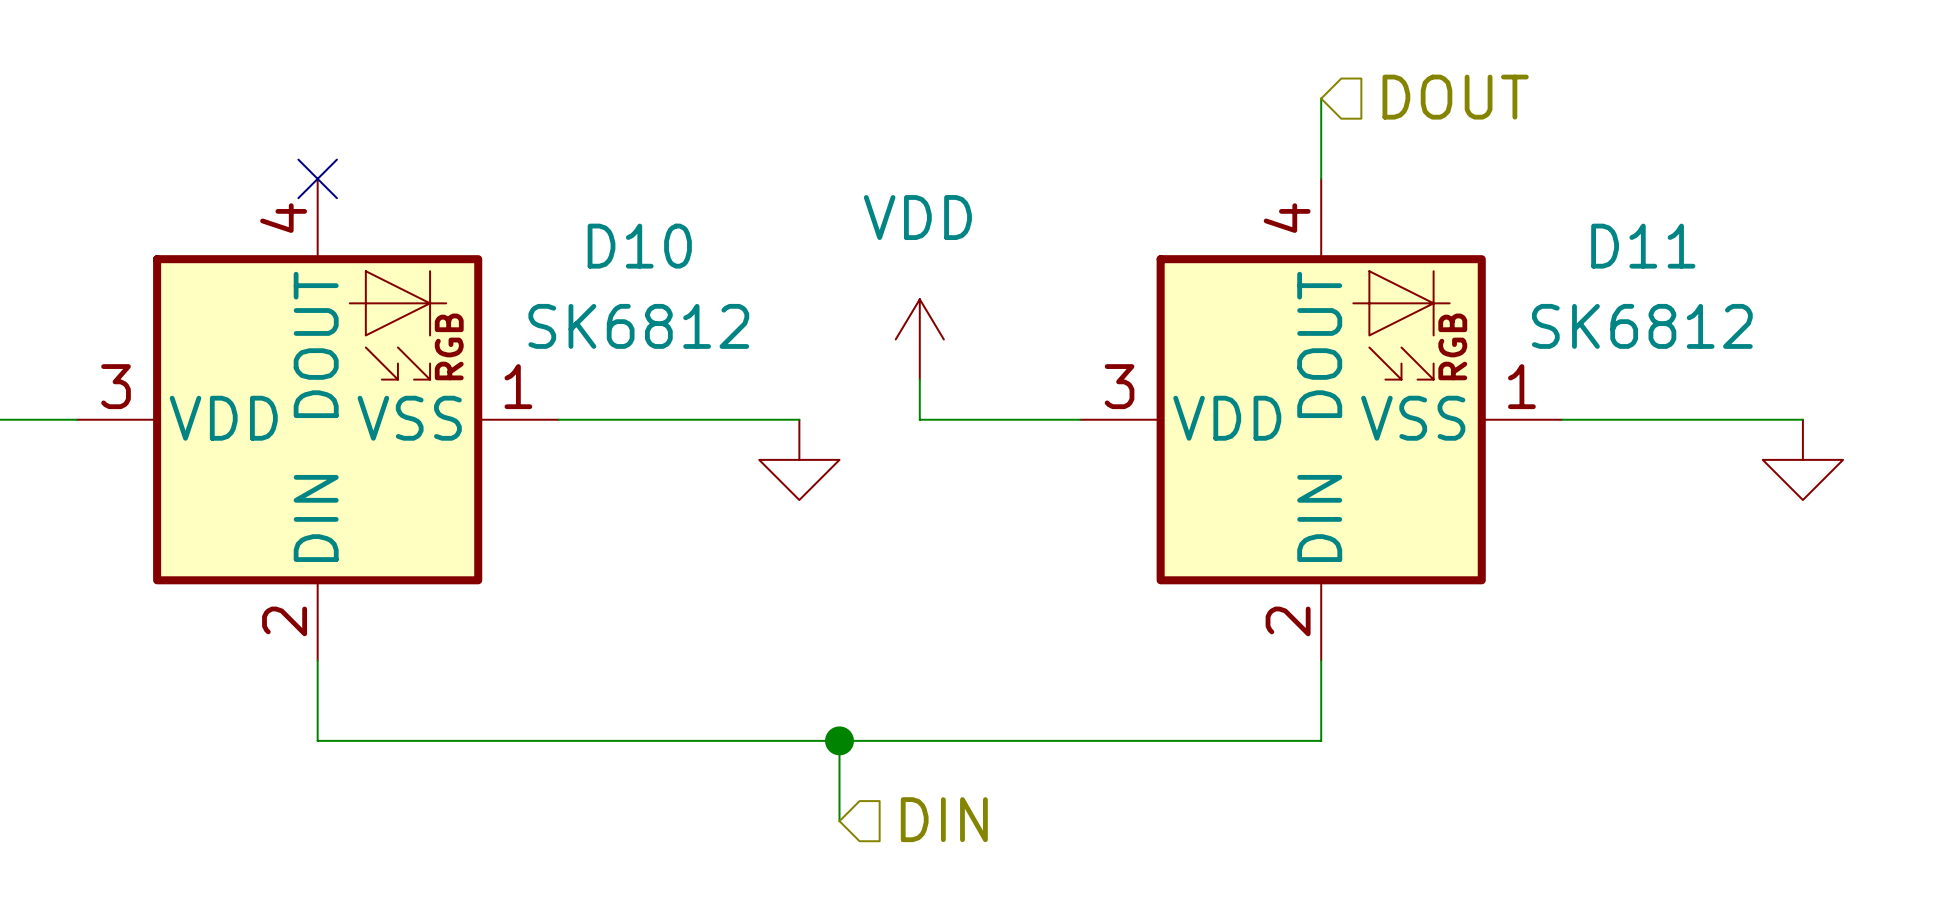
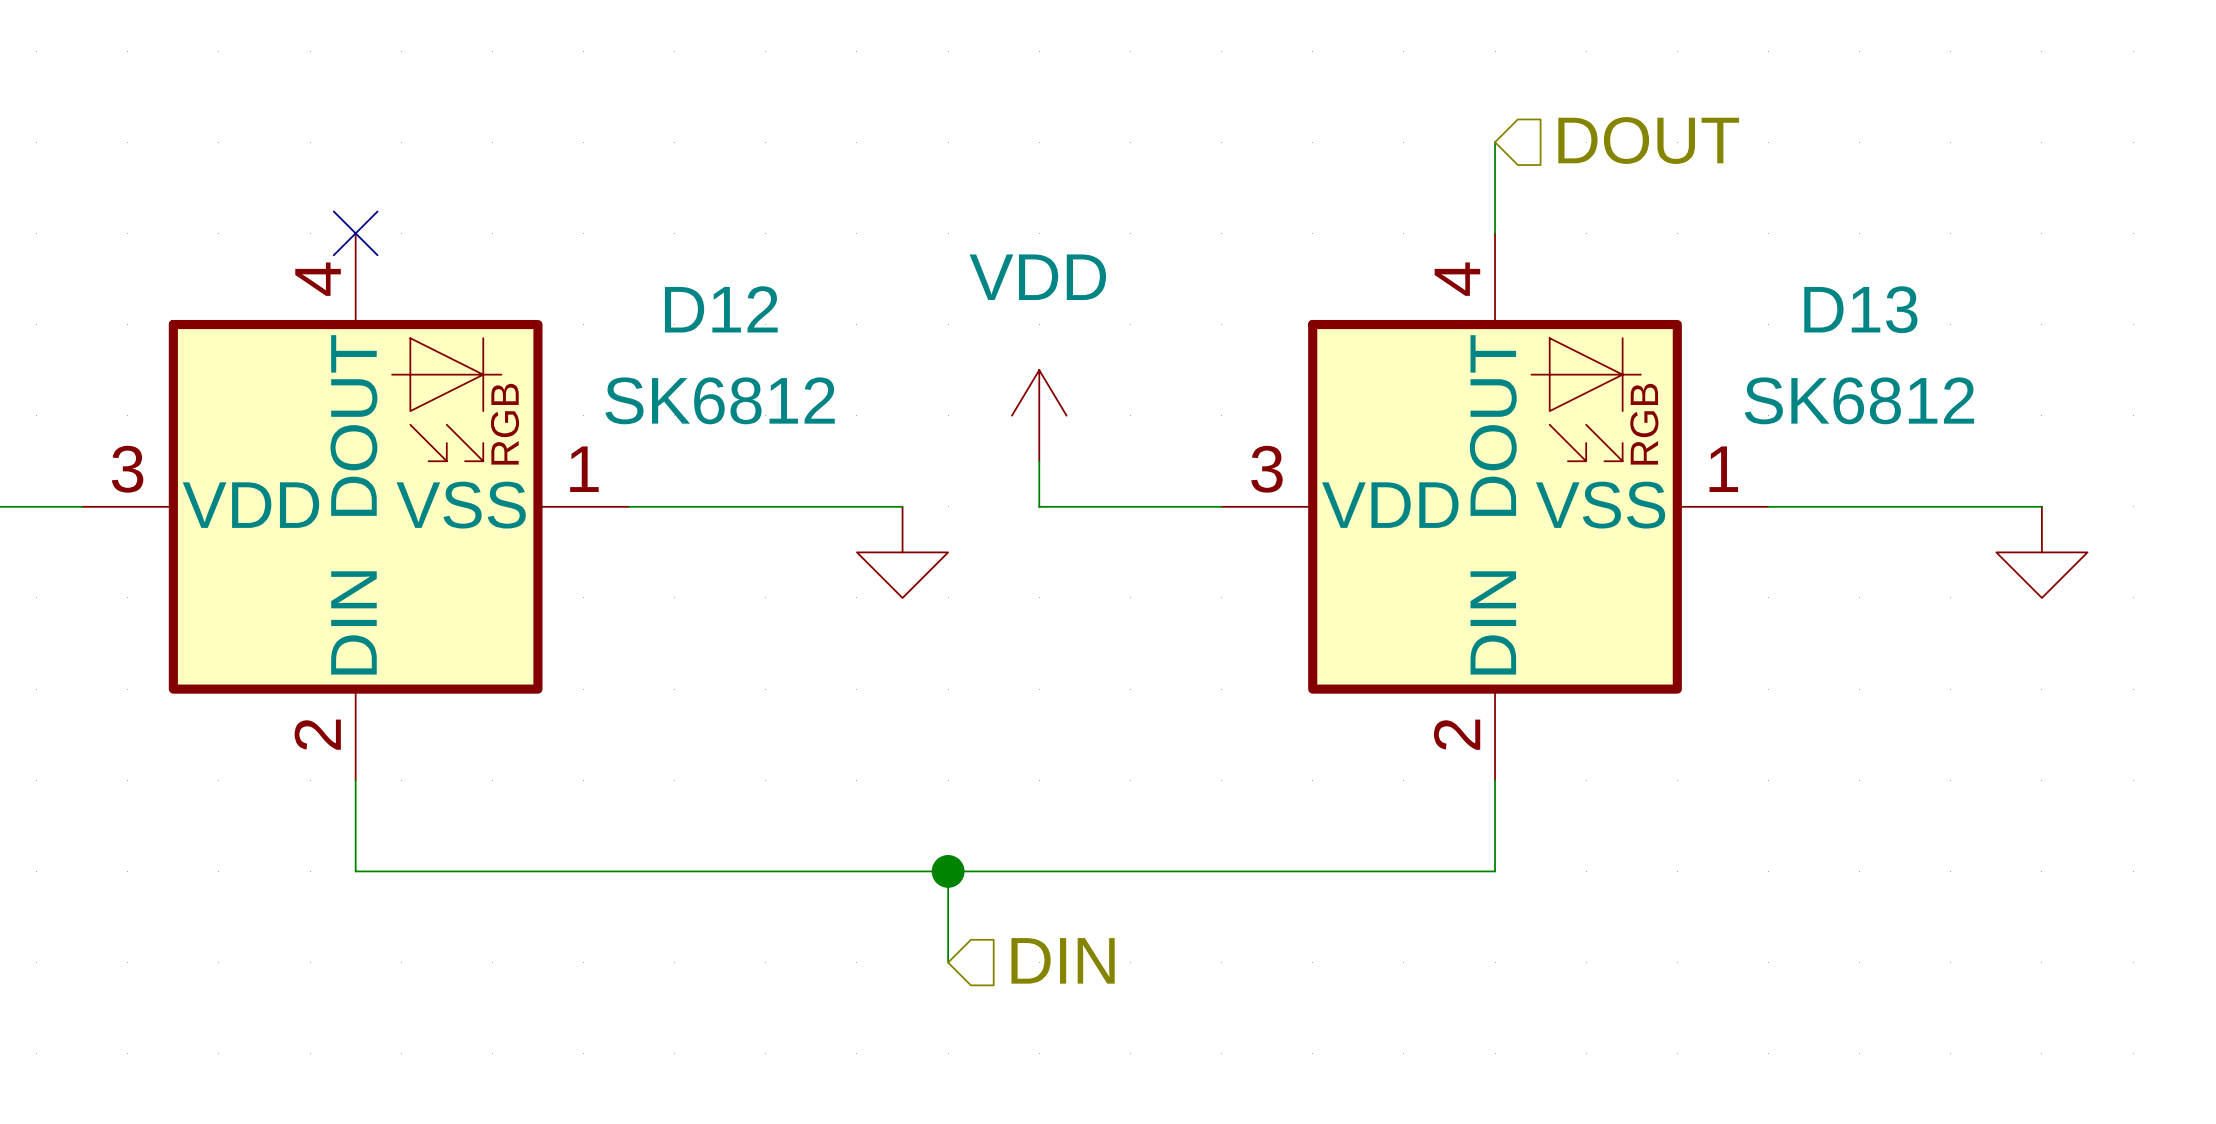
D10 name: D10 (639, 246) -> D12 (721, 309)
D11 name: D11 (1643, 246) -> D13 (1860, 309)

